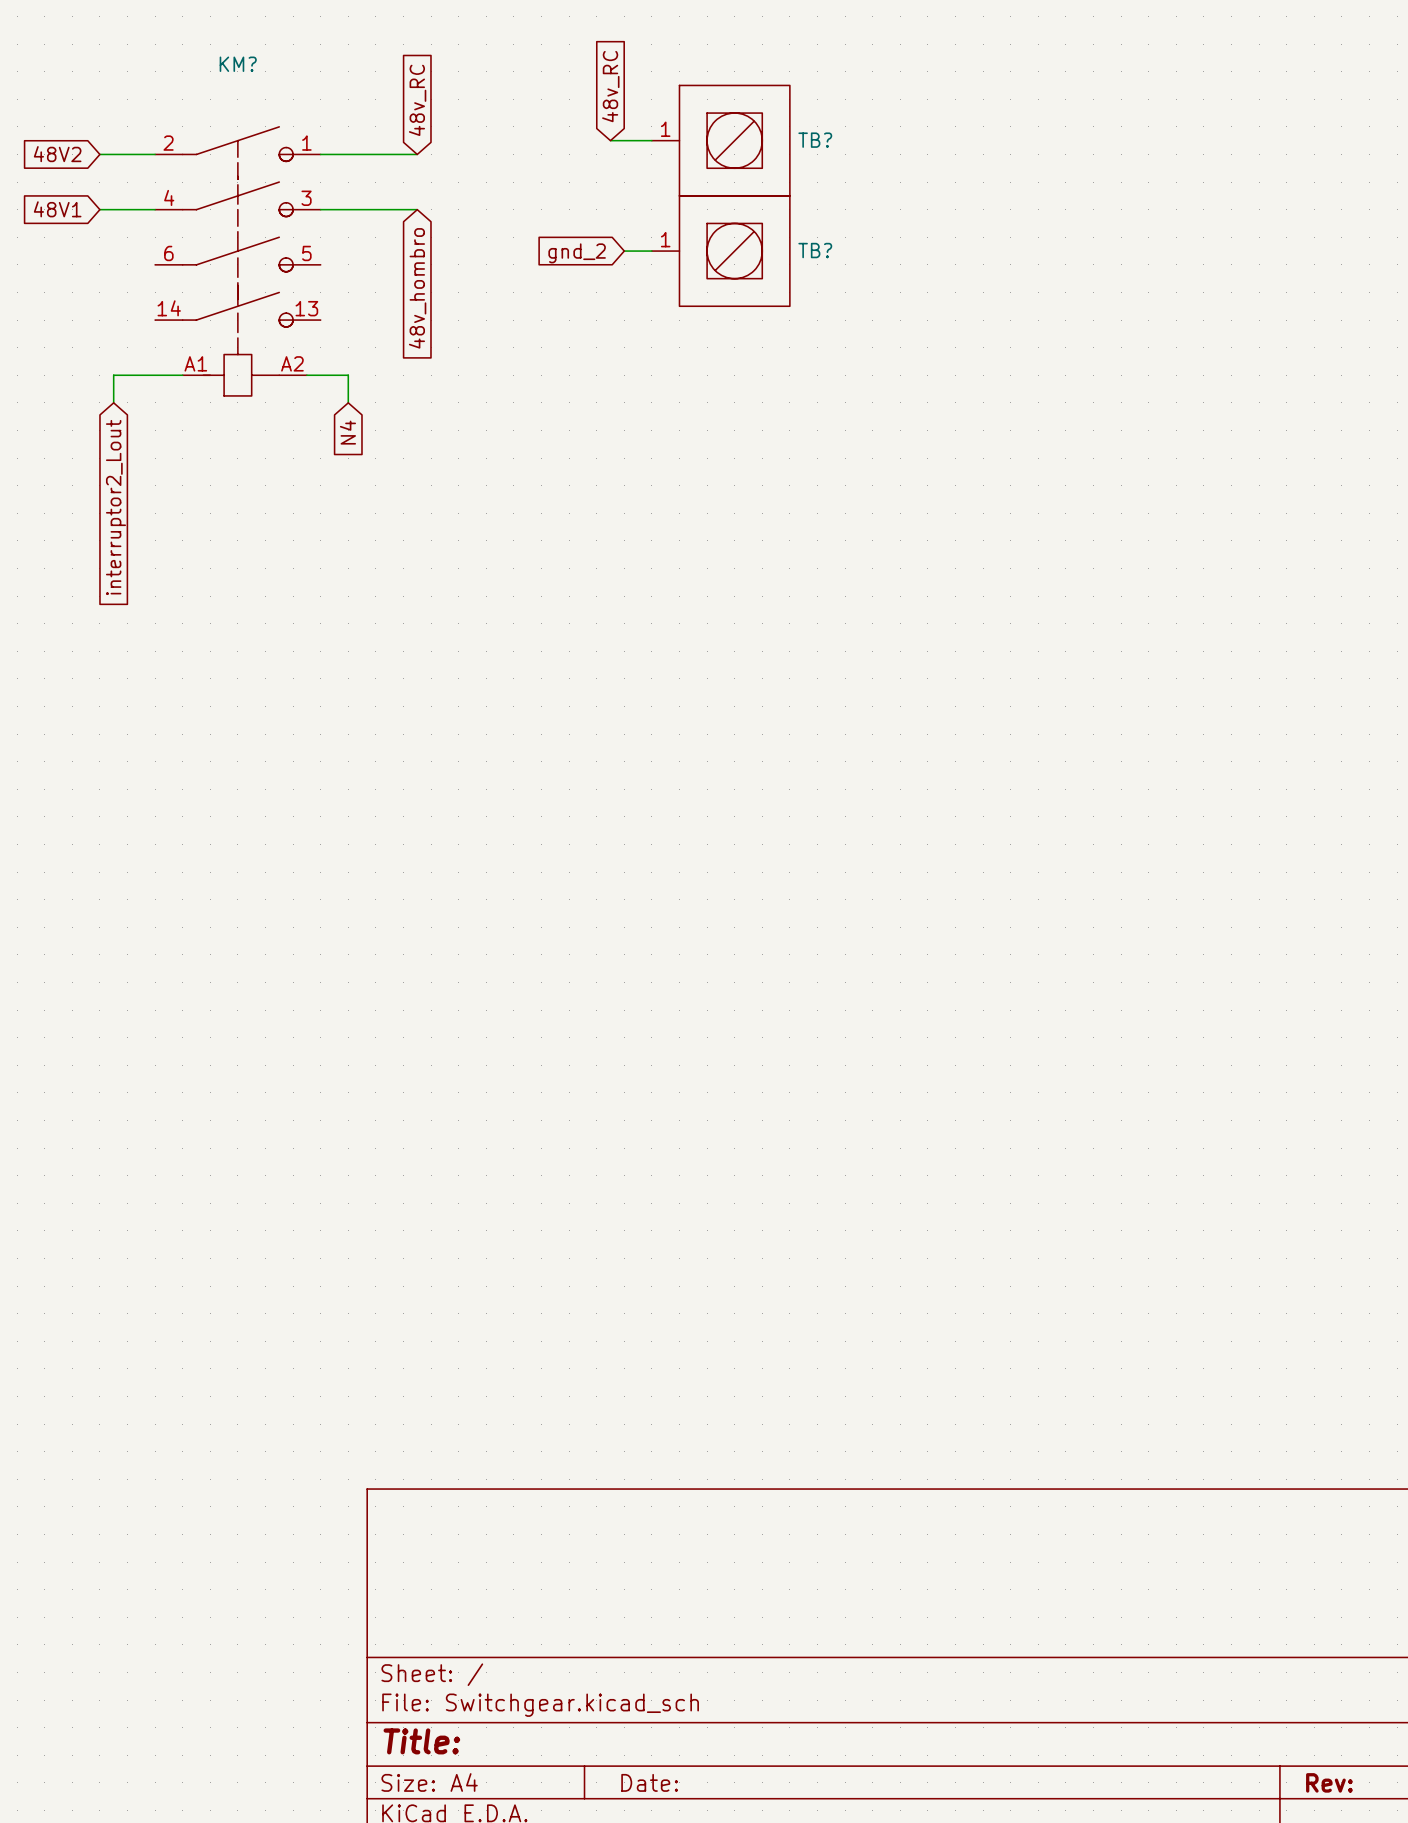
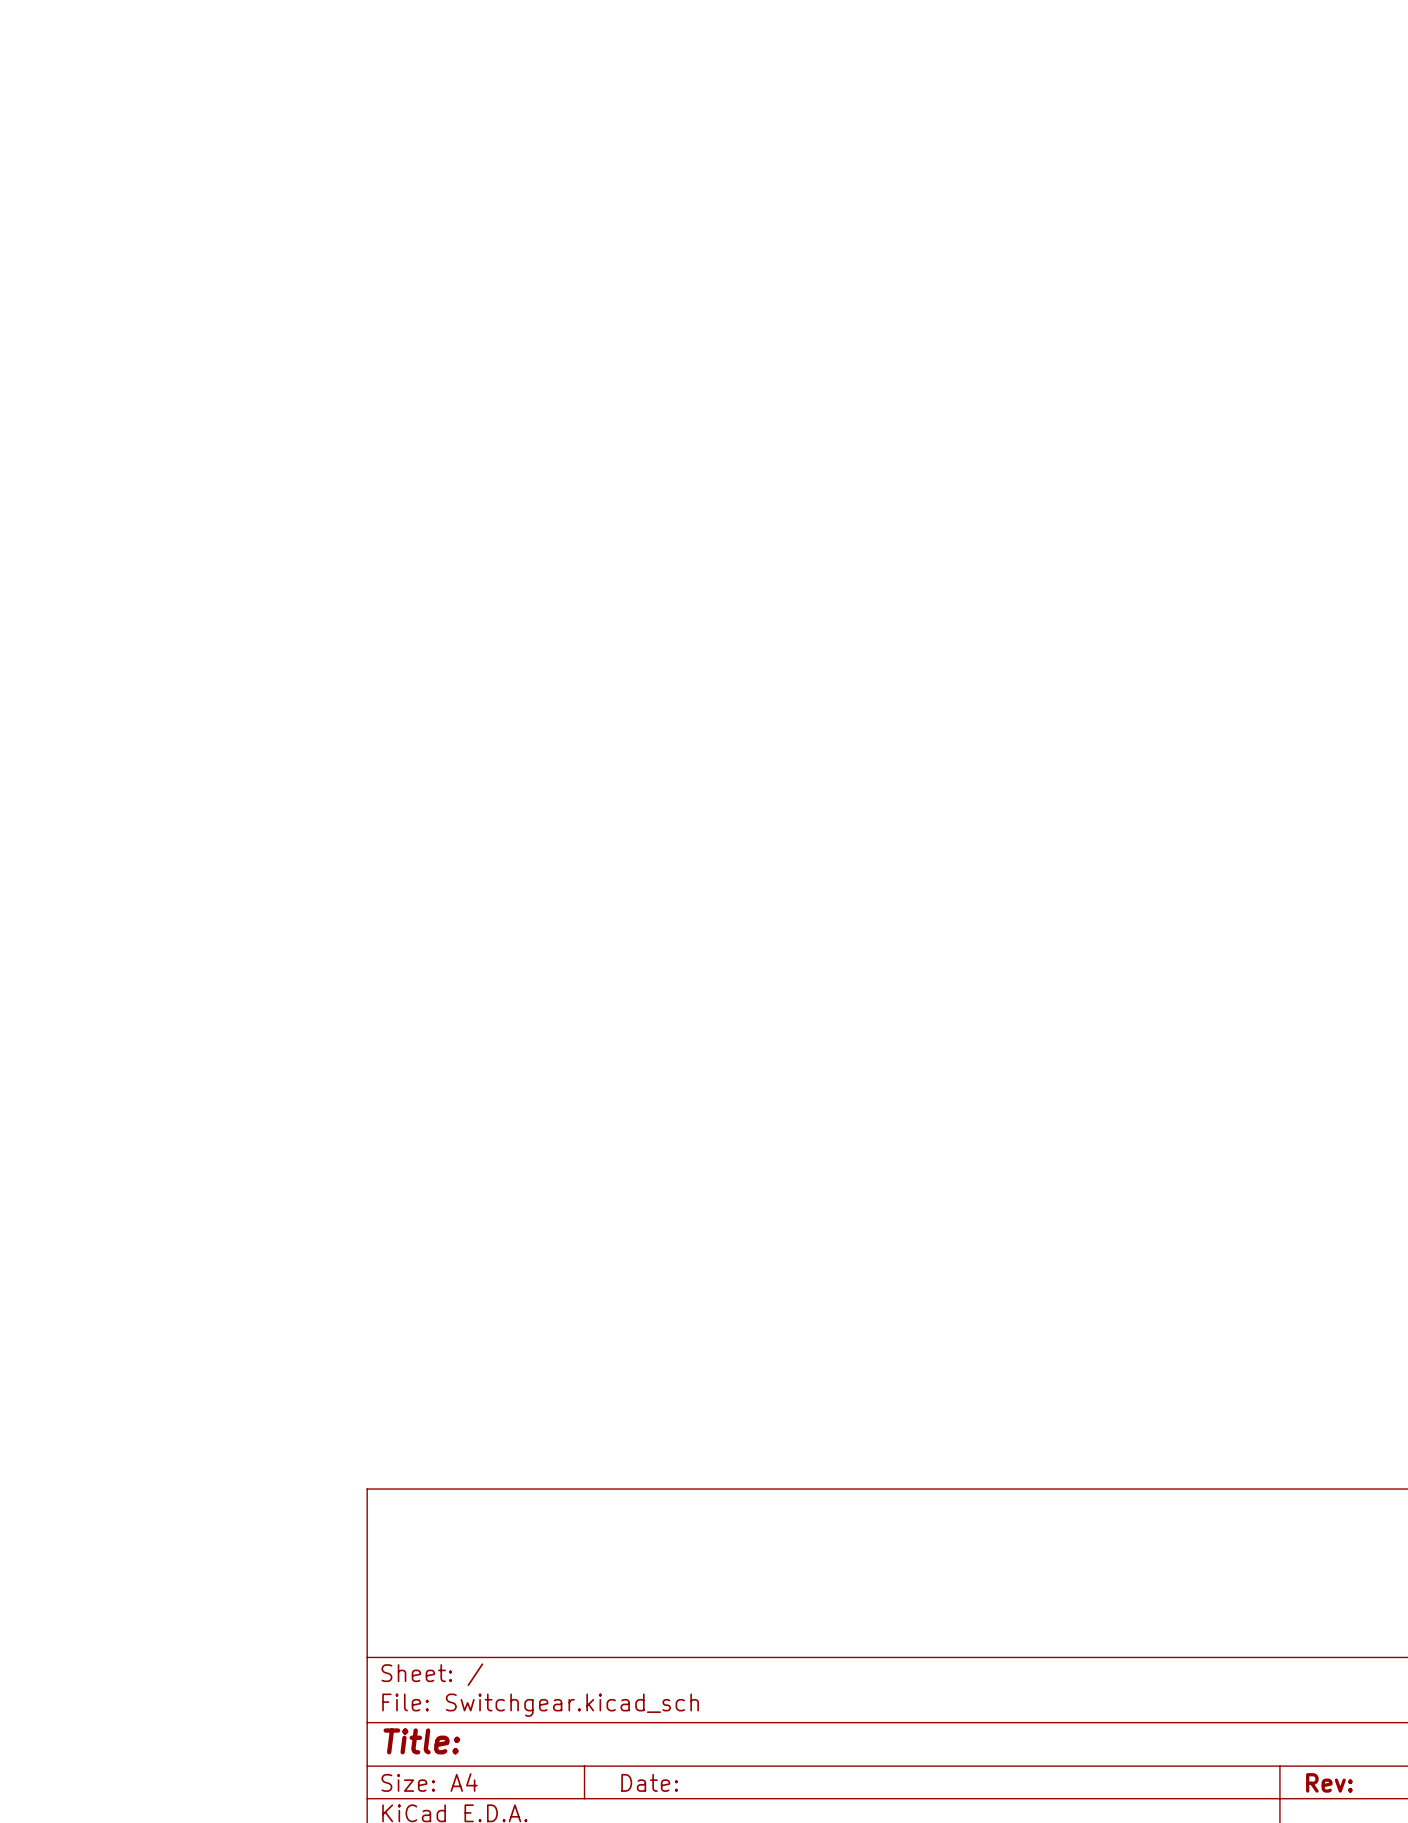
global label: 48v_RC (610, 86) -> none
global label: 48v_RC (417, 100) -> none
wire: (610, 140) (651, 140) -> none
TB?: (720, 140) -> none
global label: 48V2 (57, 154) -> none
wire: (99, 154) (155, 154) -> none
wire: (320, 154) (417, 154) -> none
global label: 48V1 (57, 209) -> none
wire: (99, 209) (155, 209) -> none
wire: (320, 209) (417, 209) -> none
wire: (624, 251) (651, 251) -> none
TB?: (720, 251) -> none
global label: gnd_2 (577, 253) -> none
KM?: (237, 261) -> none
global label: 48v_hombro (417, 288) -> none
wire: (182, 375) (113, 375) (113, 402) -> none
wire: (306, 375) (348, 375) (348, 402) -> none
global label: N4 (347, 432) -> none
global label: interruptor2_Lout (115, 507) -> none

